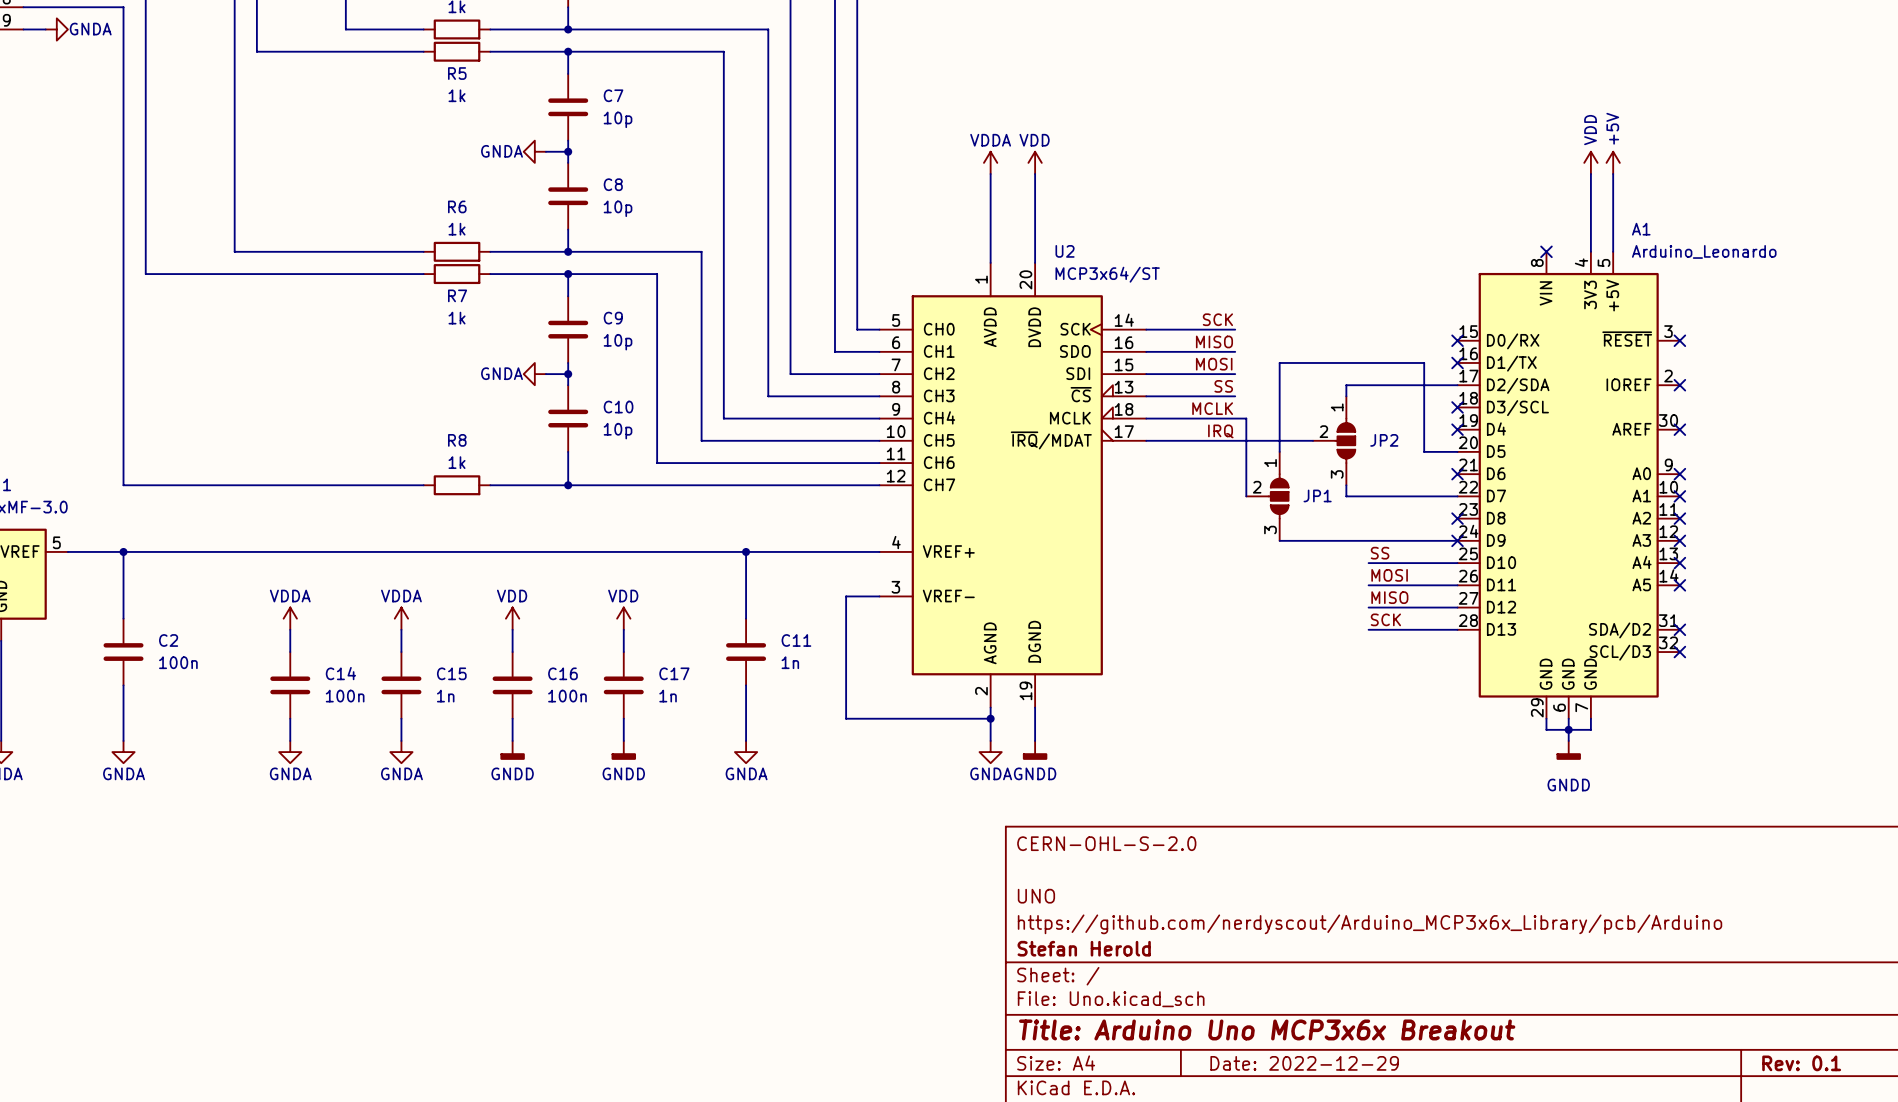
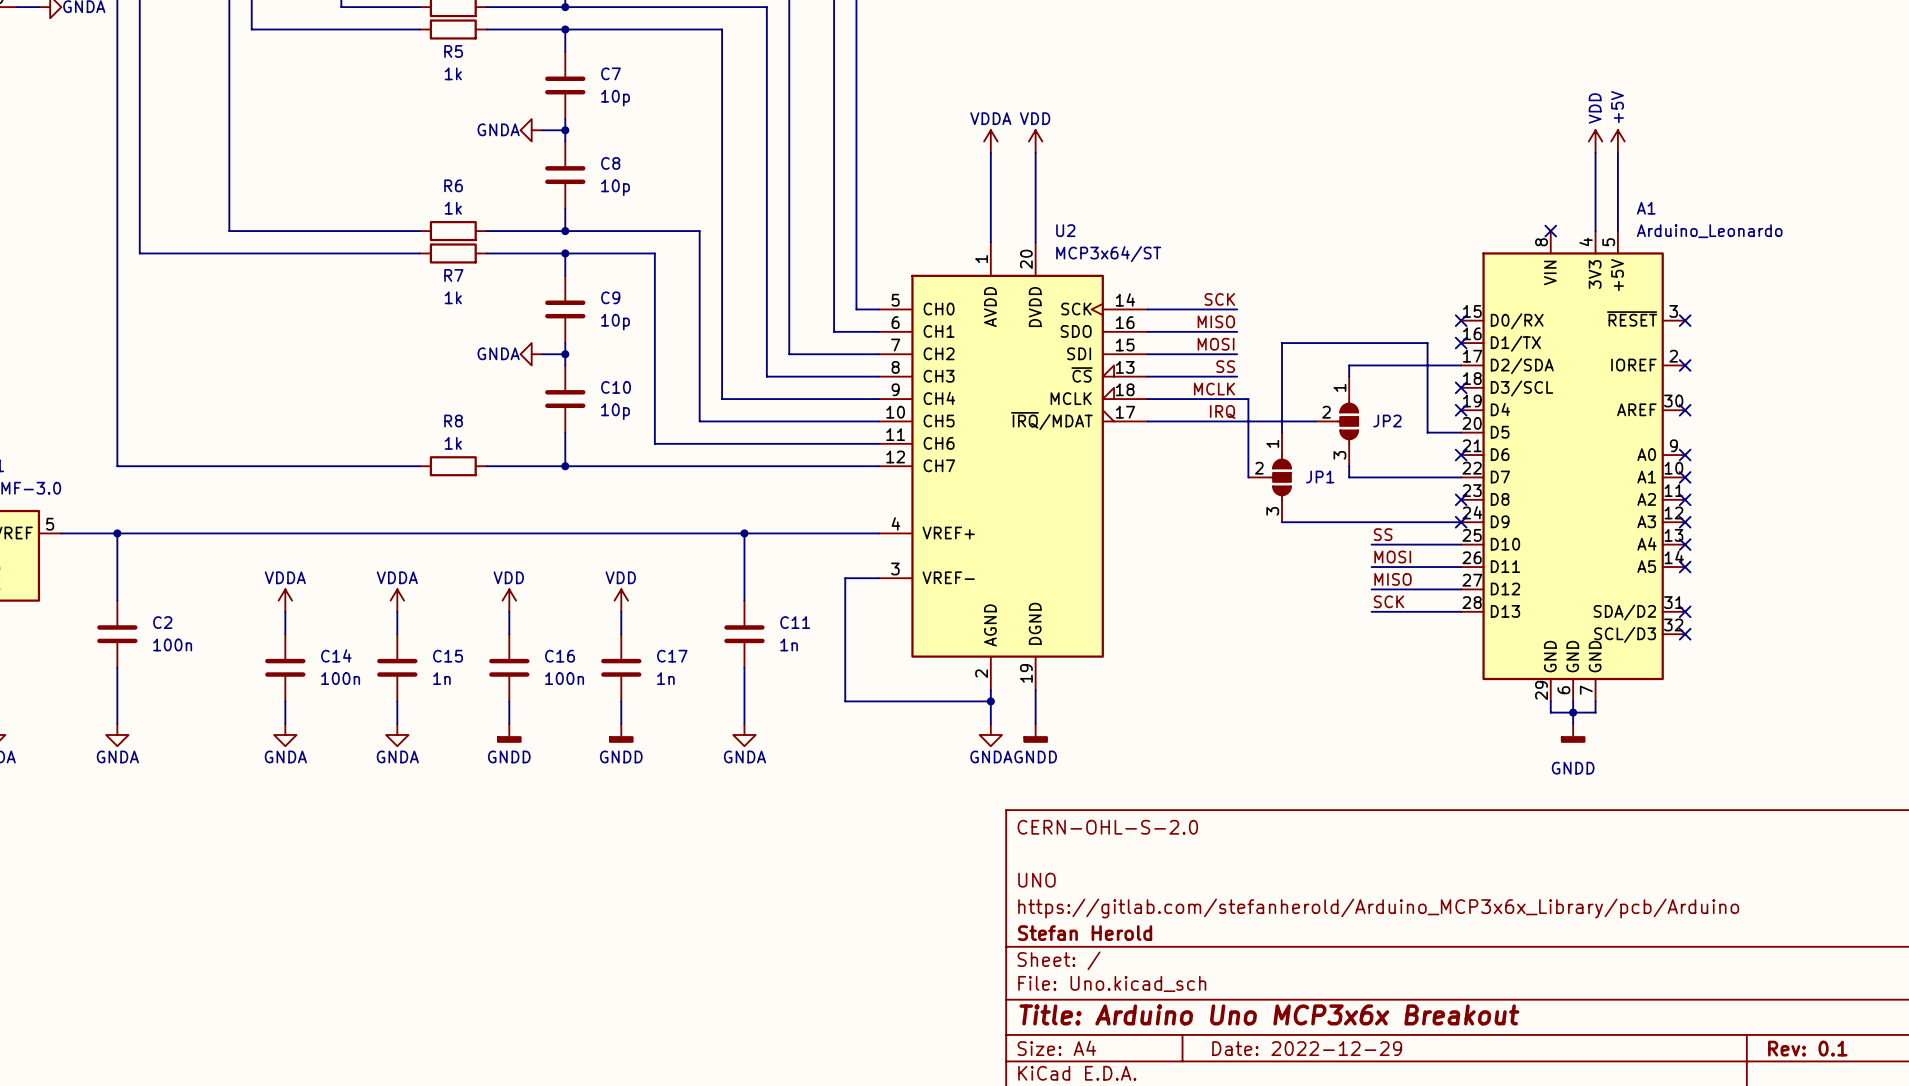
title block: https://github.com/nerdyscout/Arduino_MCP3x6x_Library/pcb/Arduino (1370, 924) -> https://gitlab.com/stefanherold/Arduino_MCP3x6x_Library/pcb/Arduino (1378, 908)

